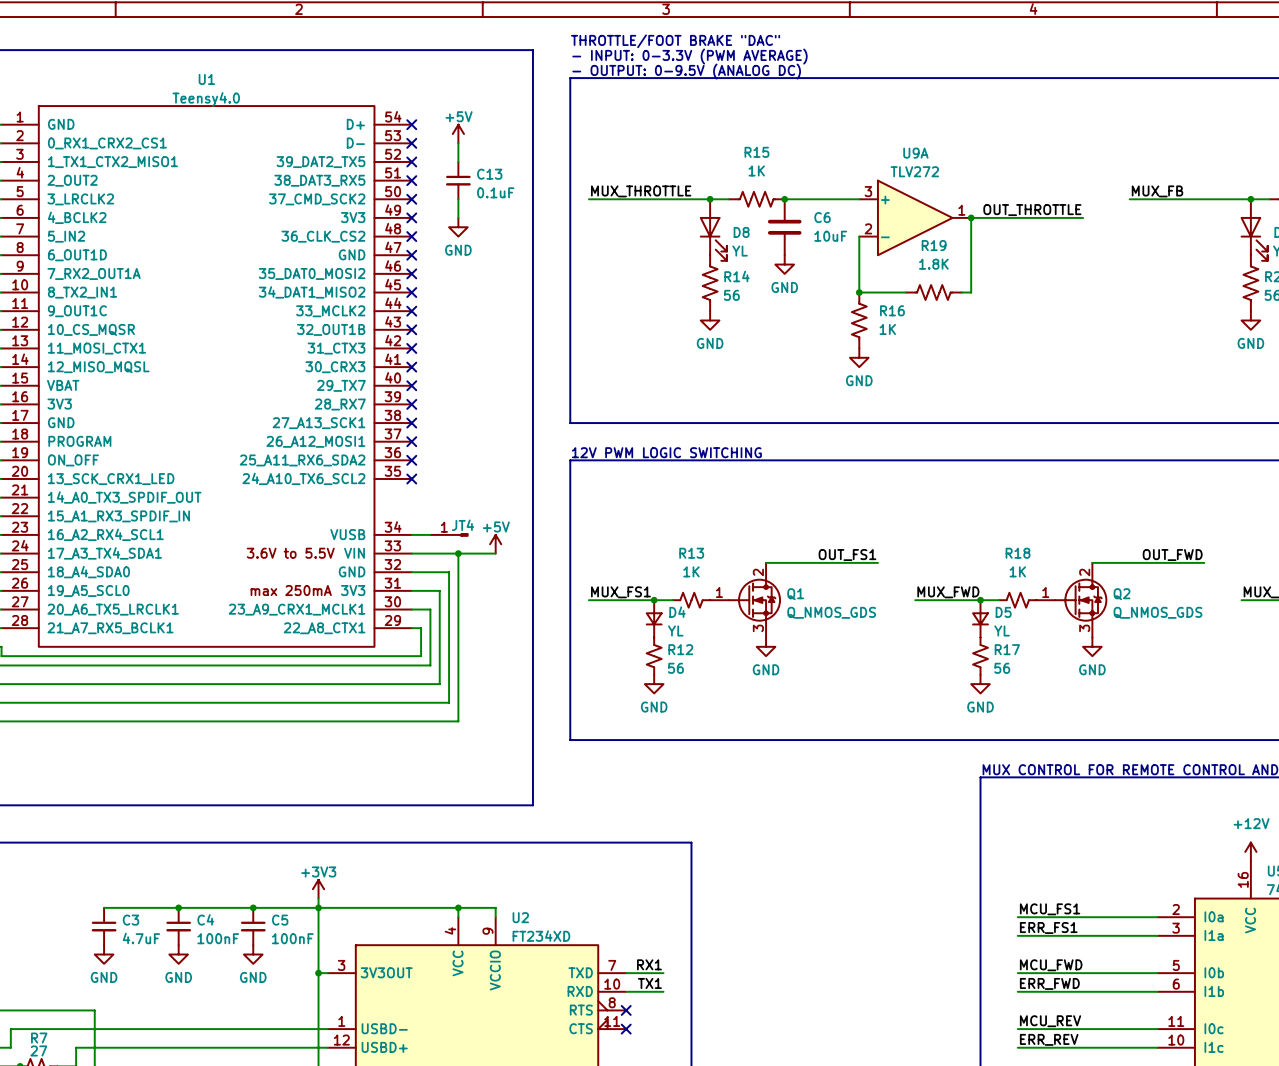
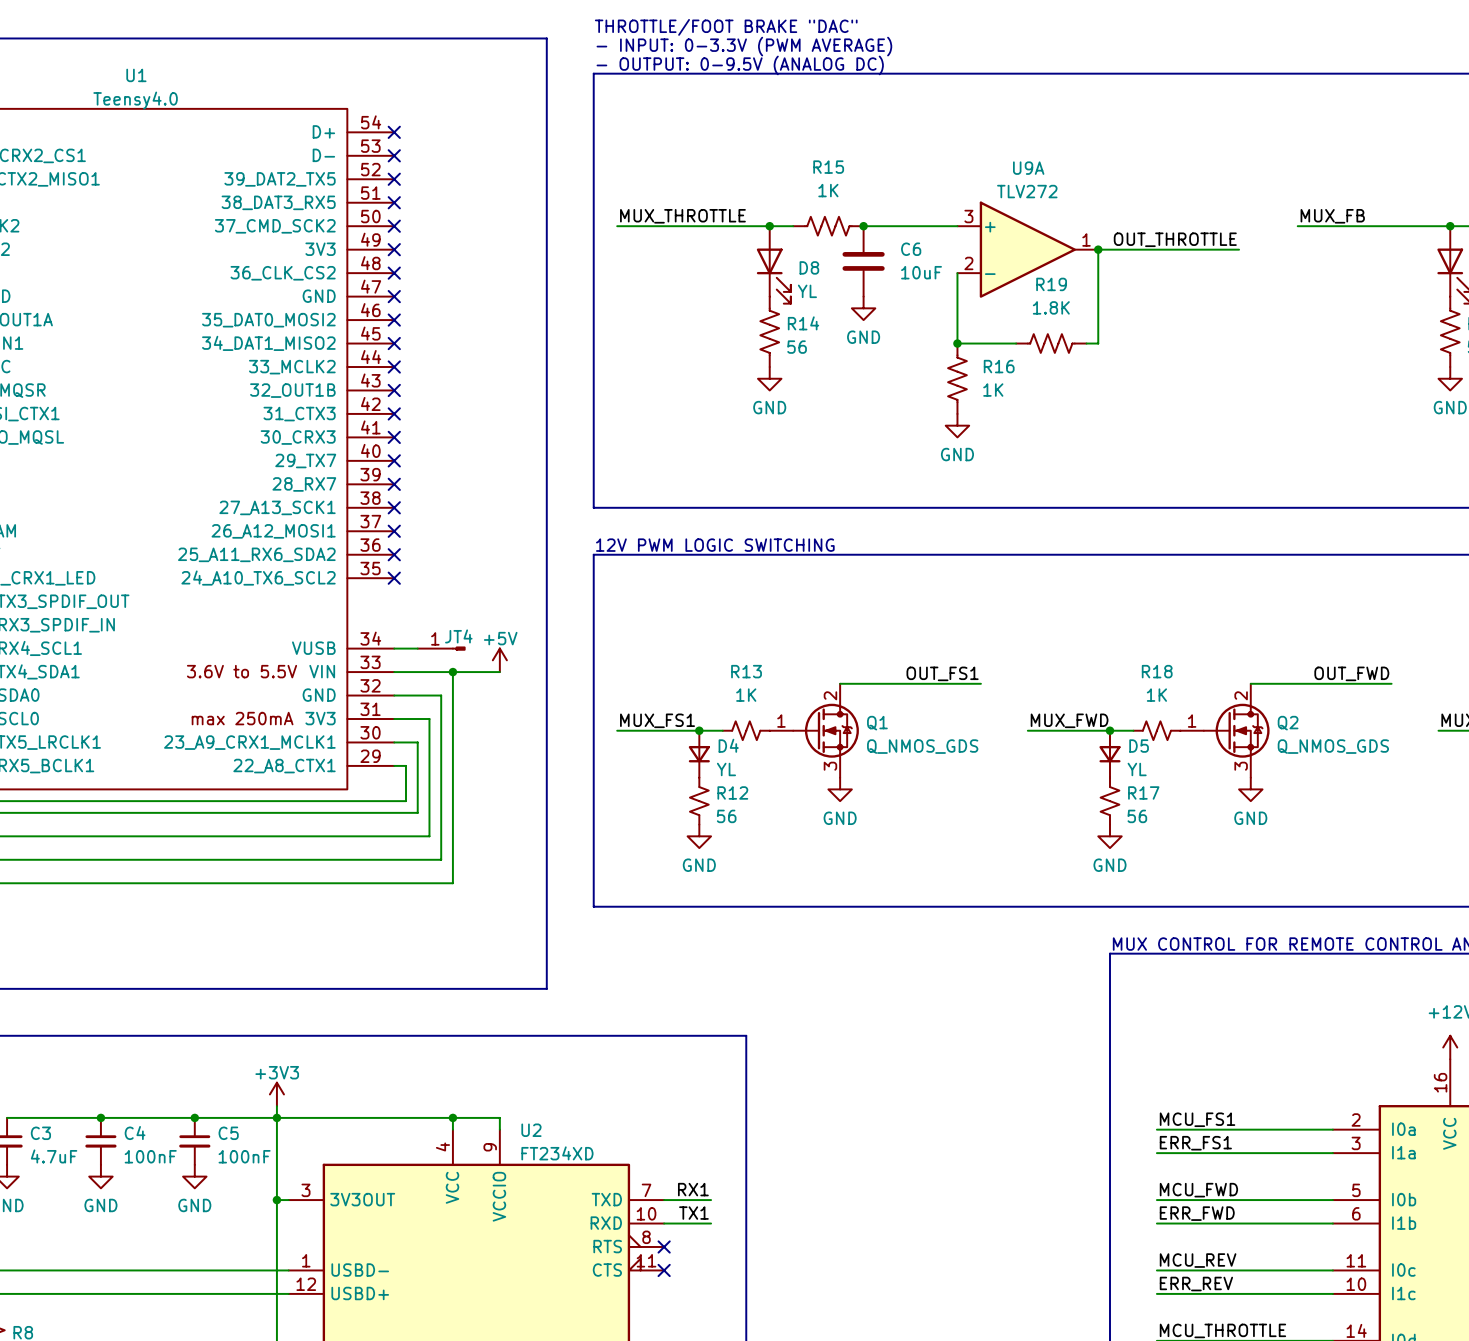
power symbol: +5V (458, 134) -> none
wire: (458, 143) (458, 161) -> none
C13: 0.1uF (458, 180) -> none
wire: (458, 199) (458, 217) -> none
power symbol: GND (458, 227) -> none

